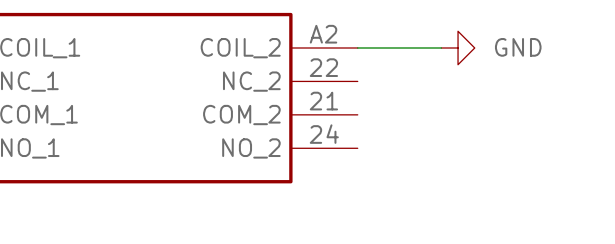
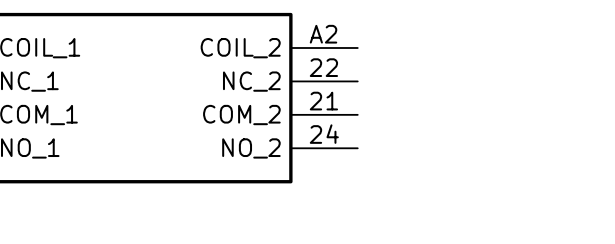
wire: (357, 47) (441, 47) -> none
power symbol: GND (458, 47) -> none

